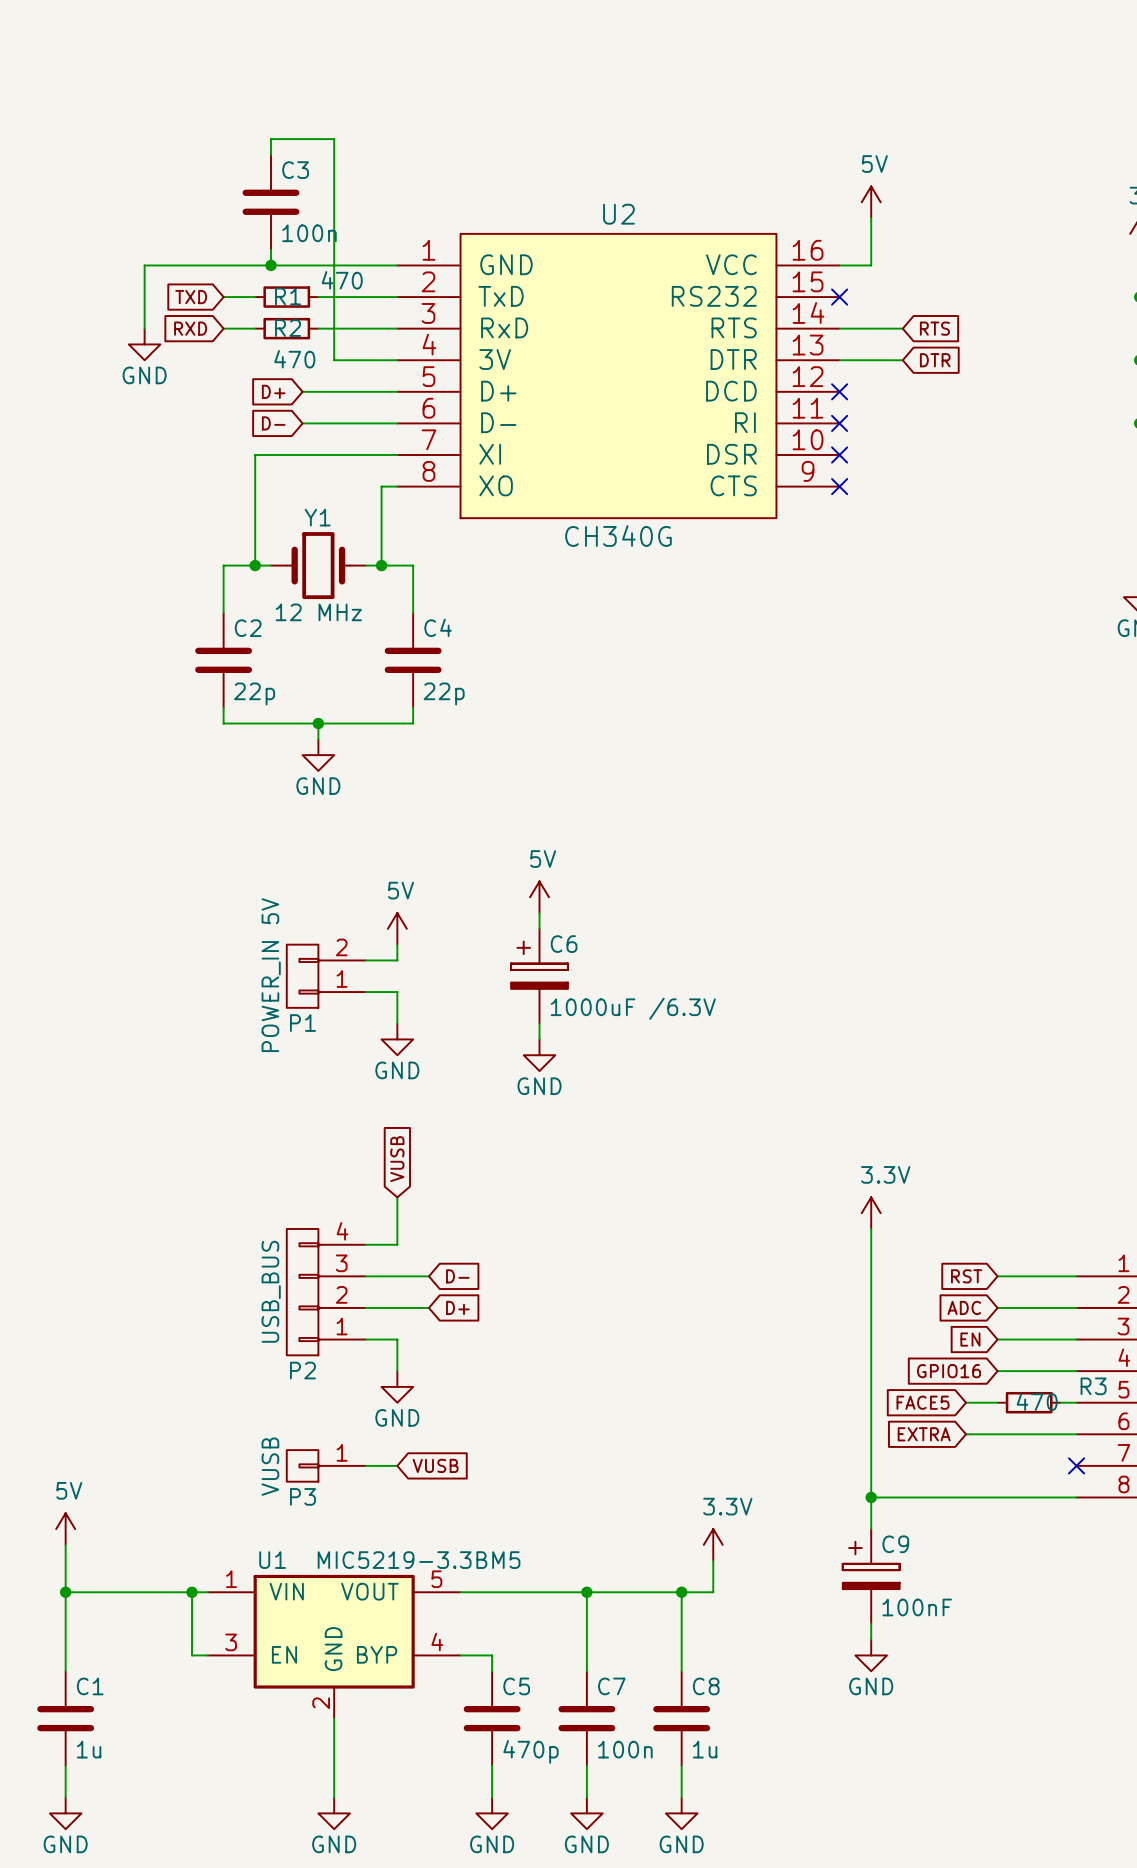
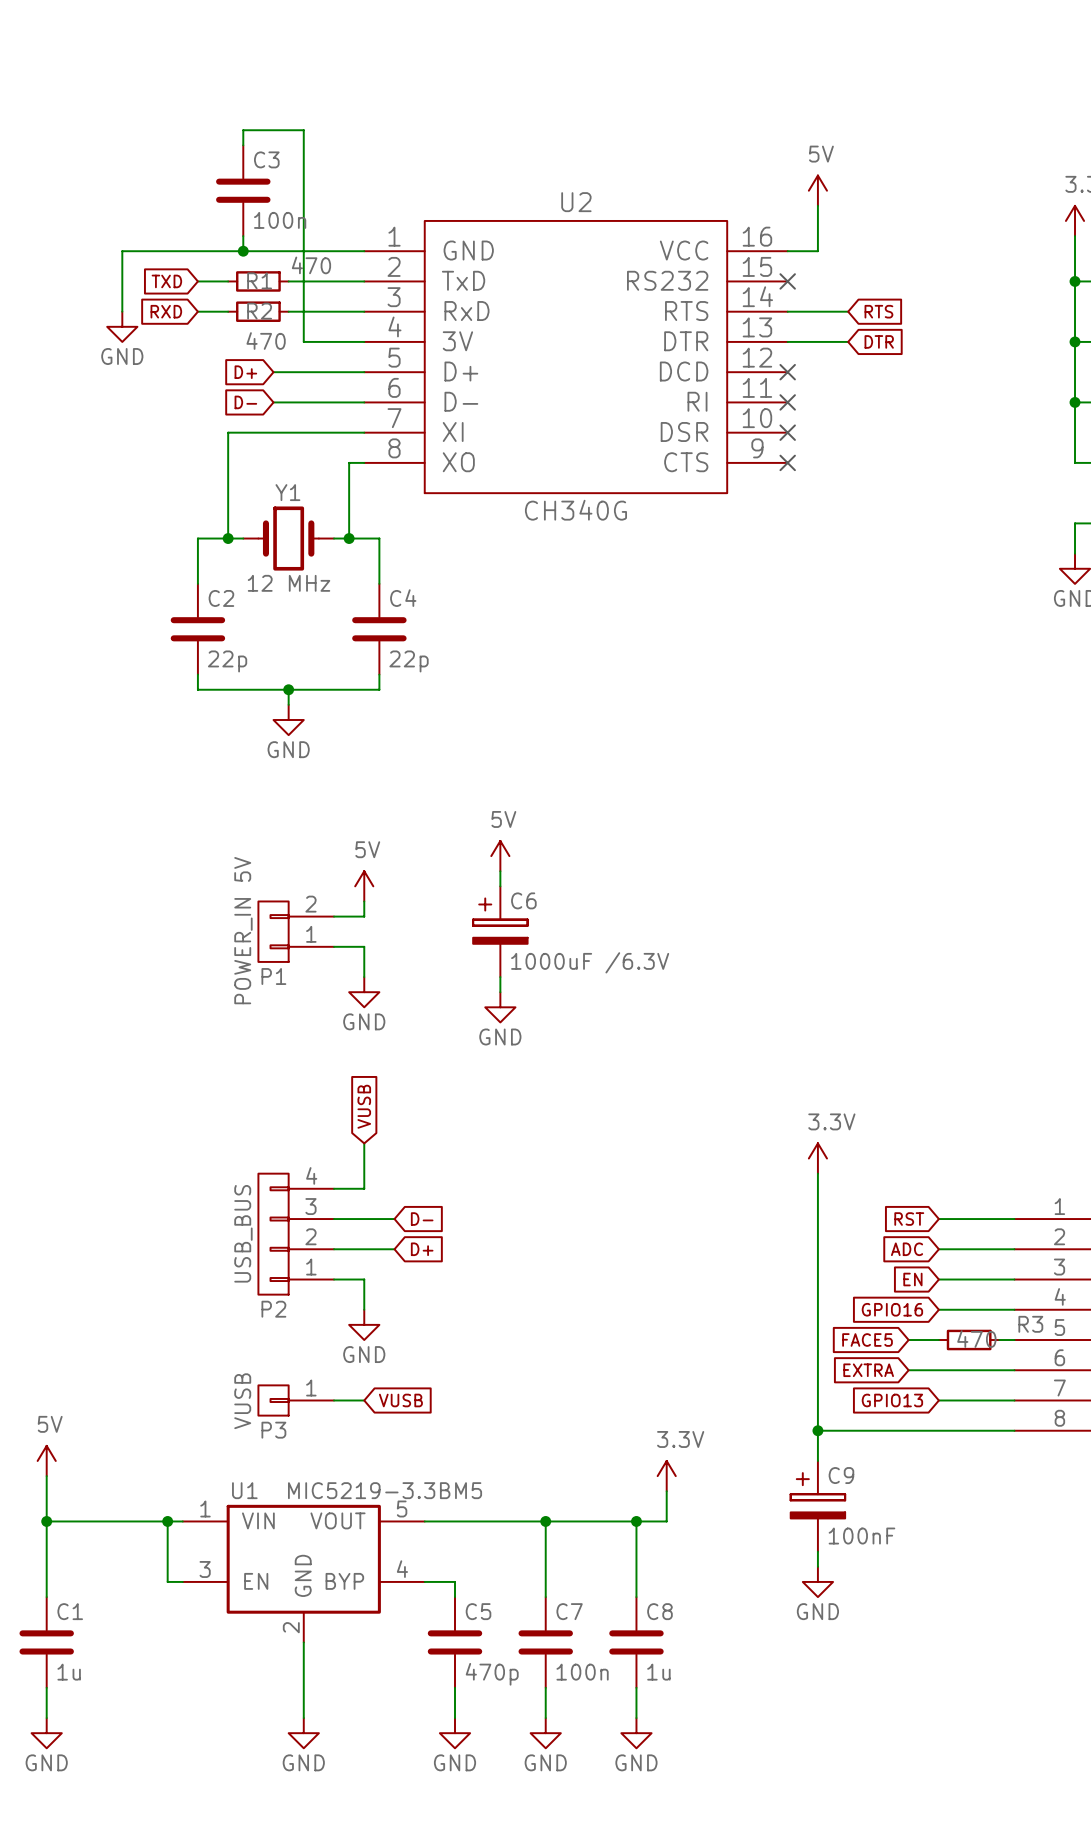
global label: none -> GPIO13 (892, 1400)
wire: none -> (938, 1400) (1014, 1400)
no-connect mark: (1076, 1465) -> none

